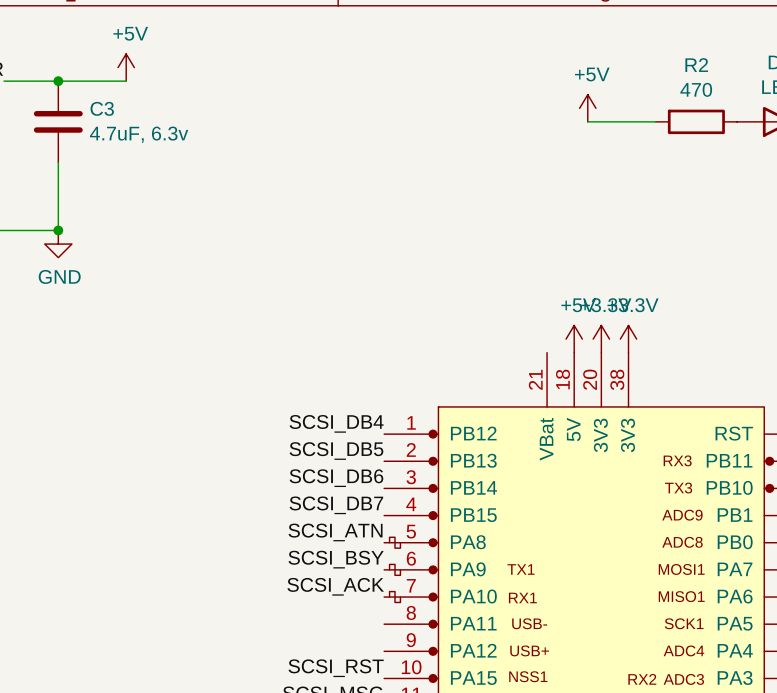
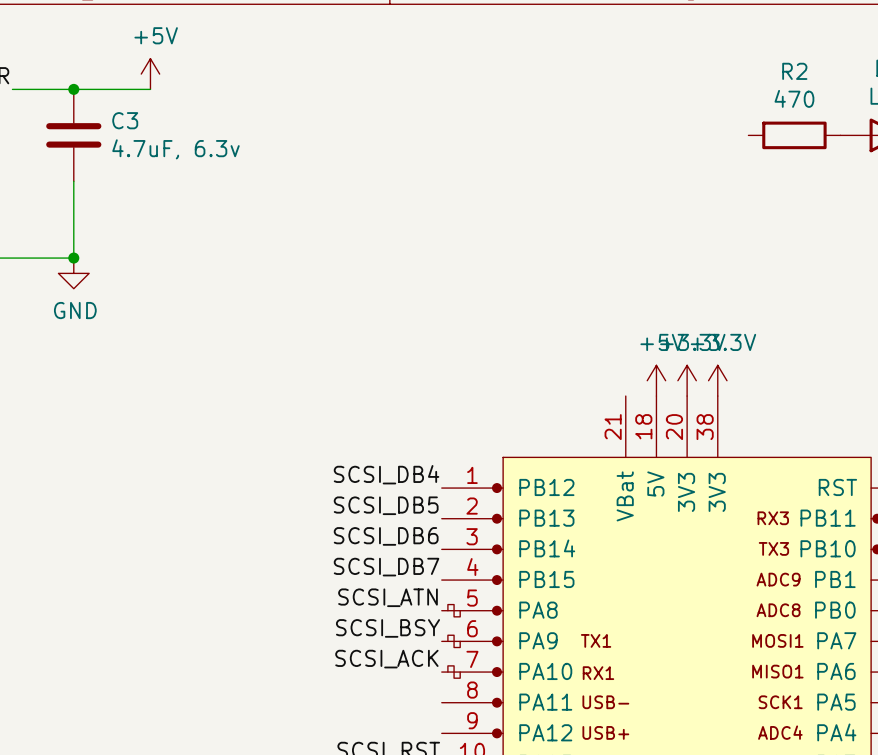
power symbol: +5V (587, 108) -> none
wire: (587, 121) (655, 121) -> none

